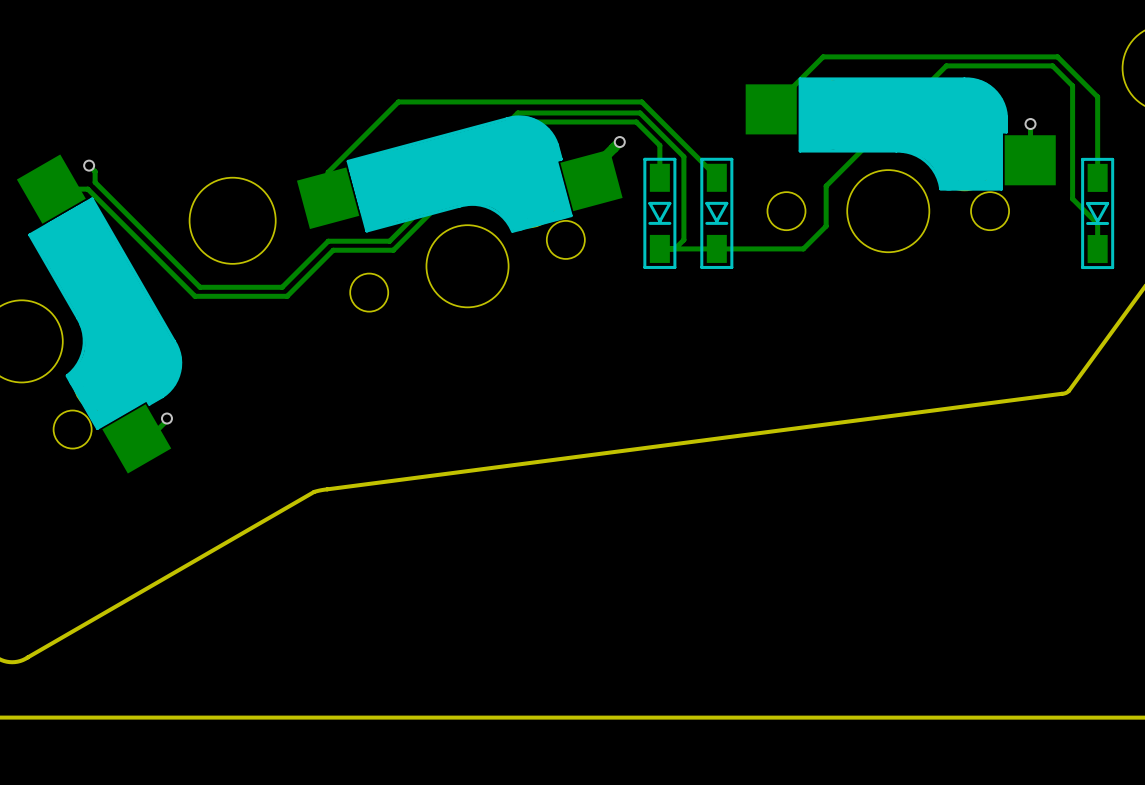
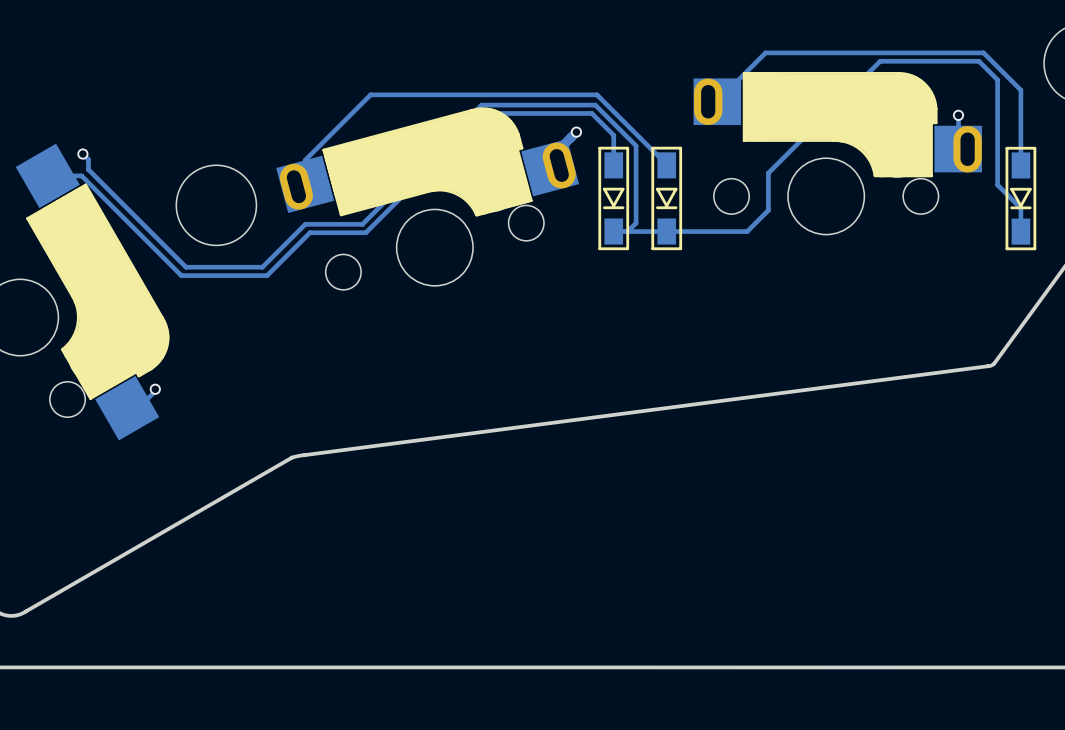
part footprint: [745, 77, 1056, 253] -> [693, 72, 982, 235]
part footprint: [296, 115, 623, 312] -> [276, 107, 580, 290]

